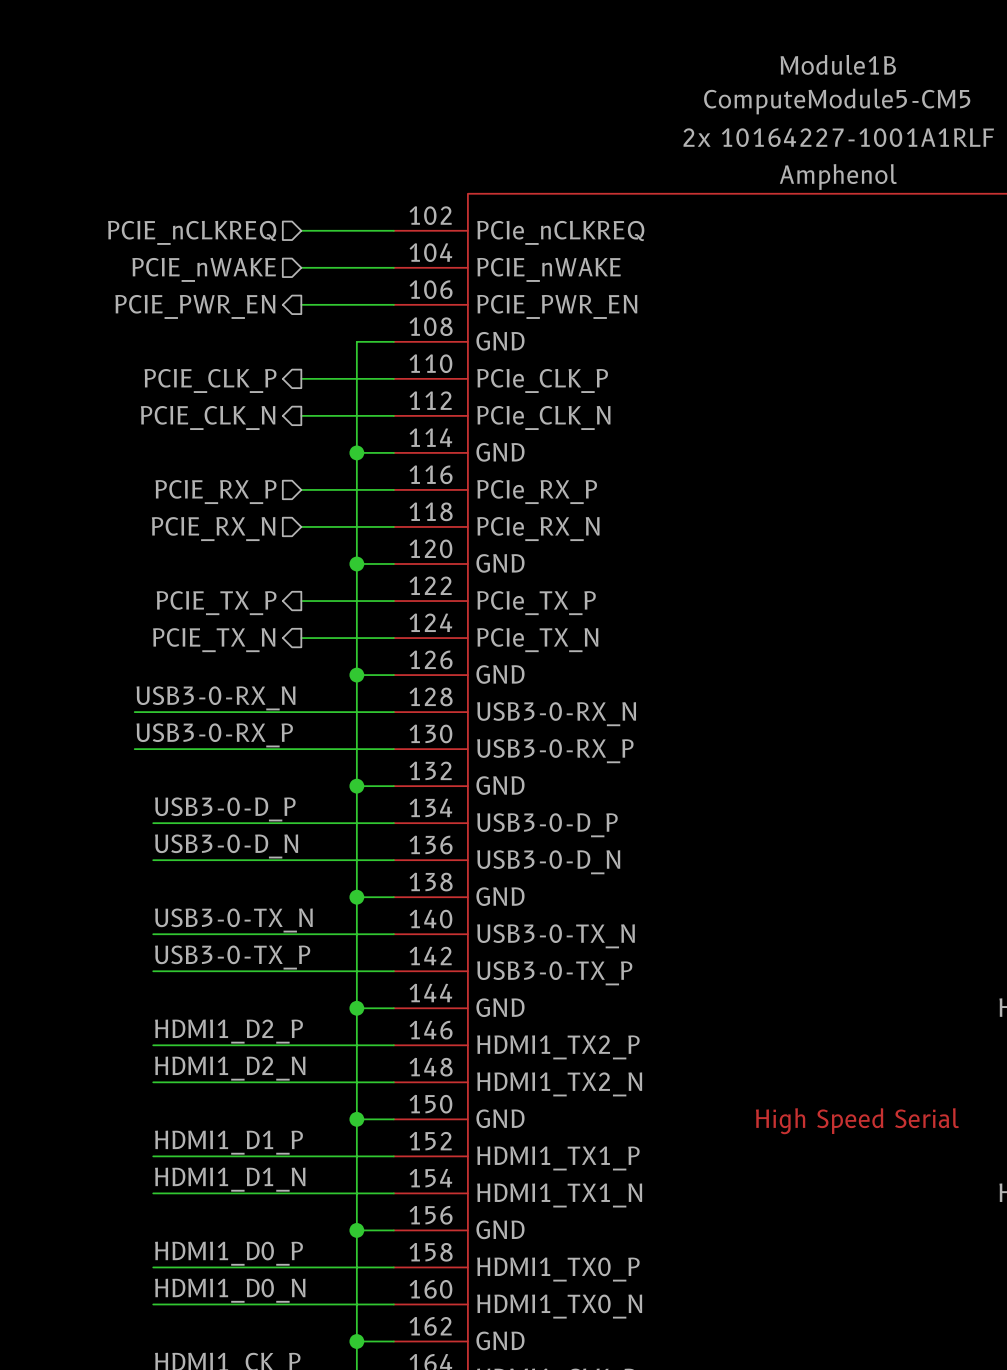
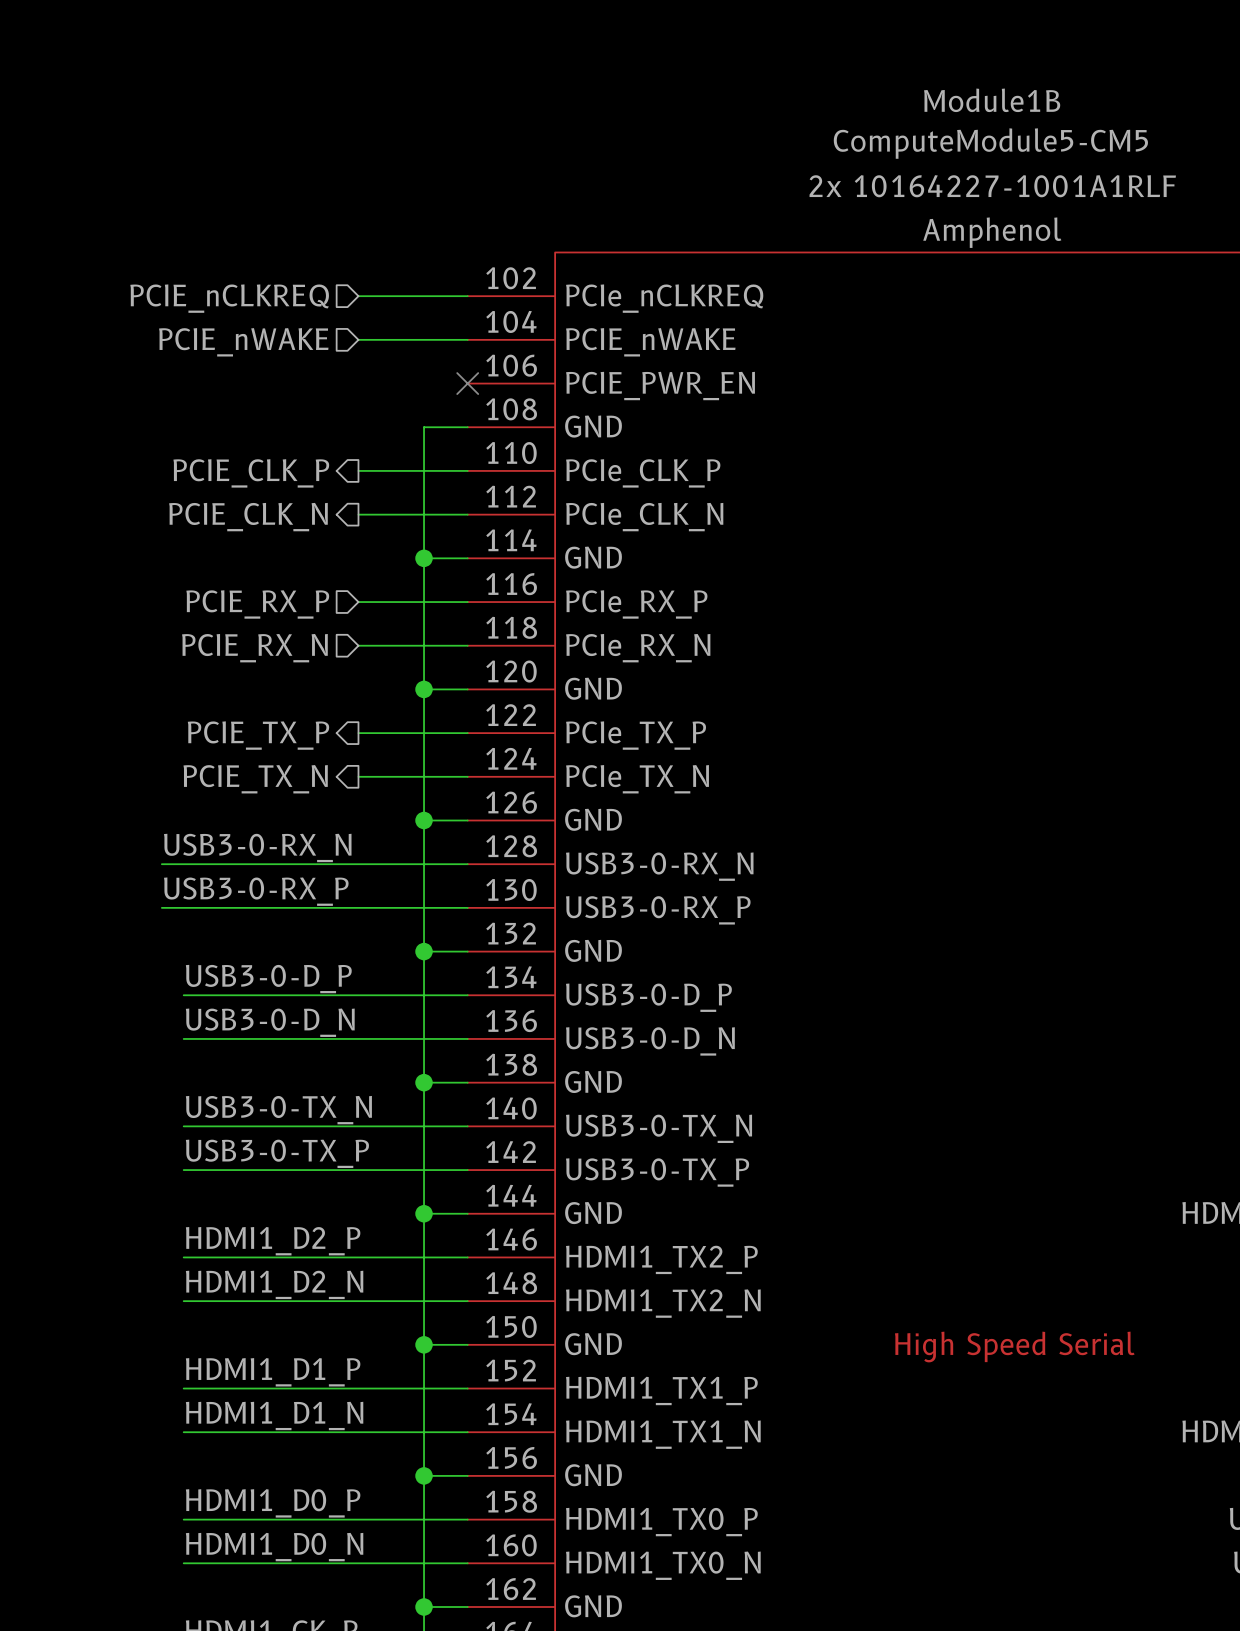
wire: (301, 304) (393, 304) -> none
no-connect mark: none -> (467, 383)
hierarchical label: PCIE_PWR_EN (195, 306) -> none

